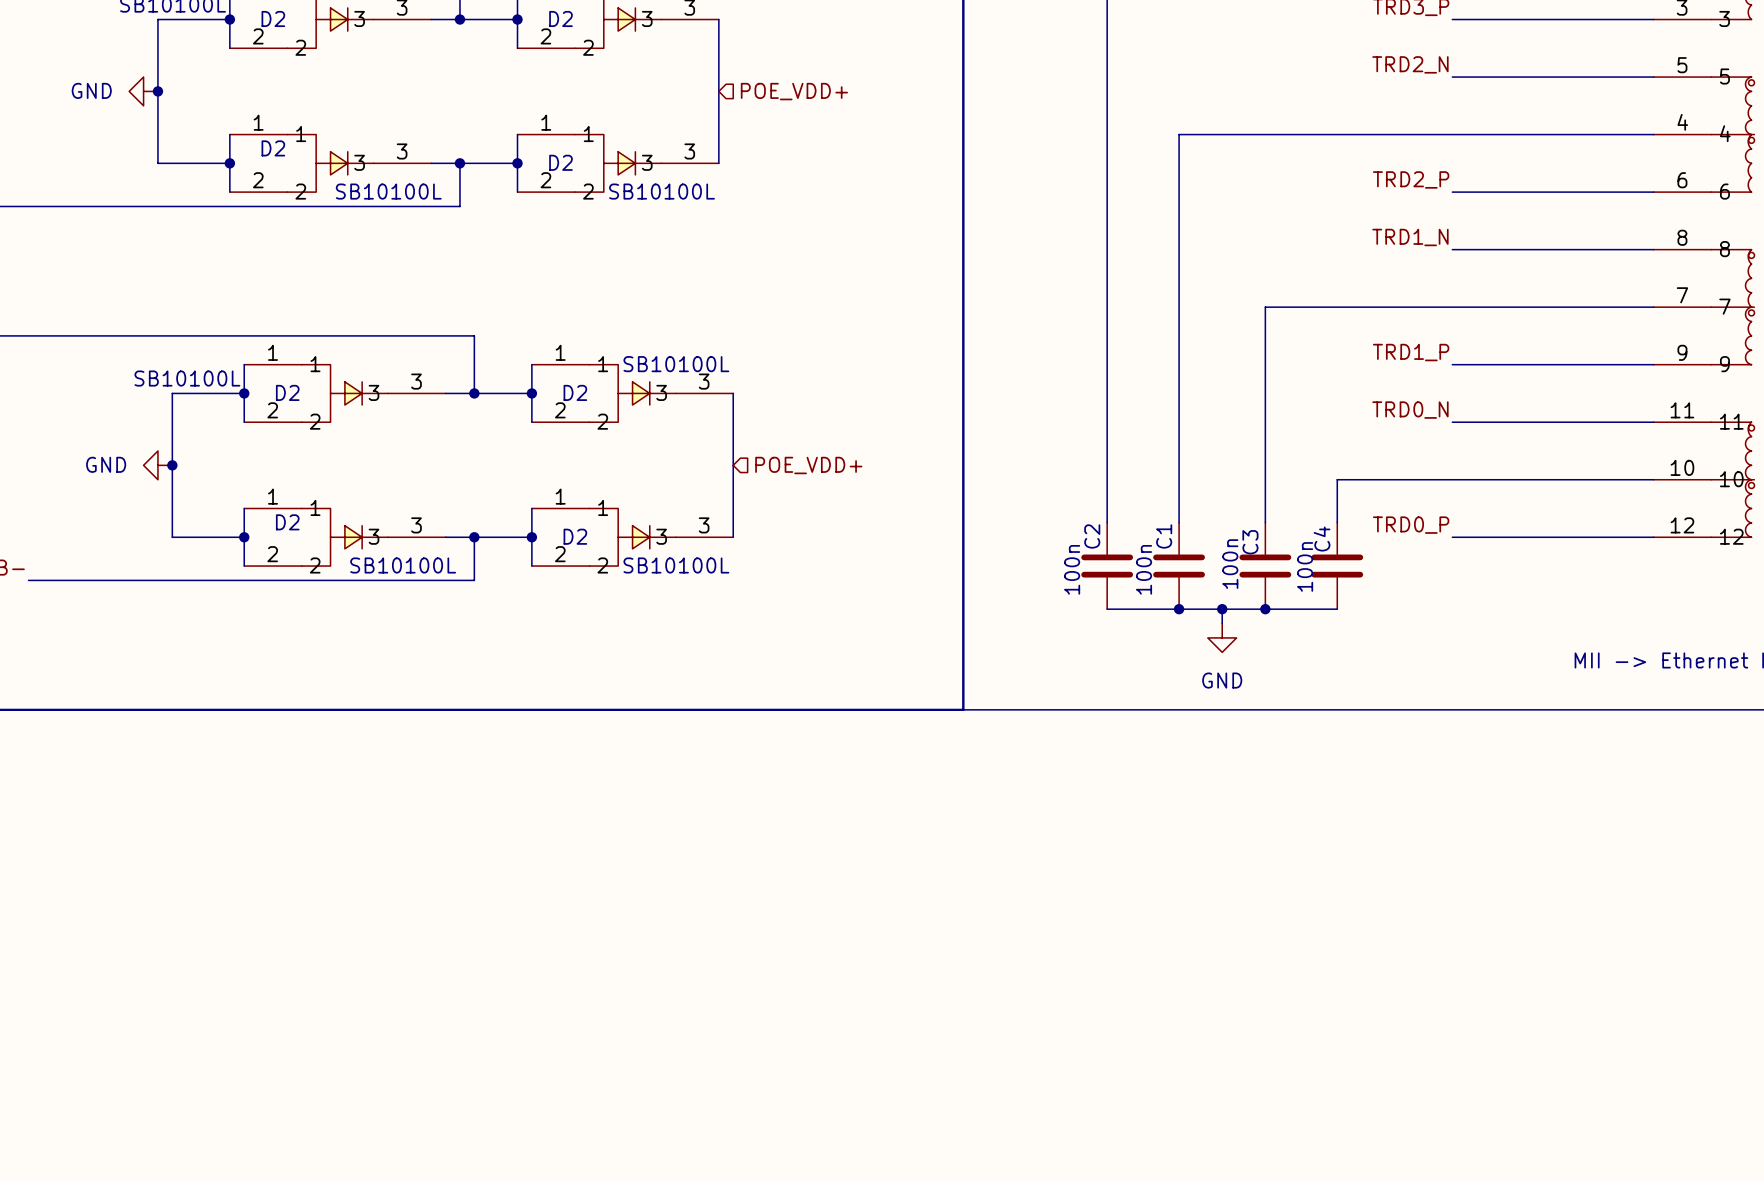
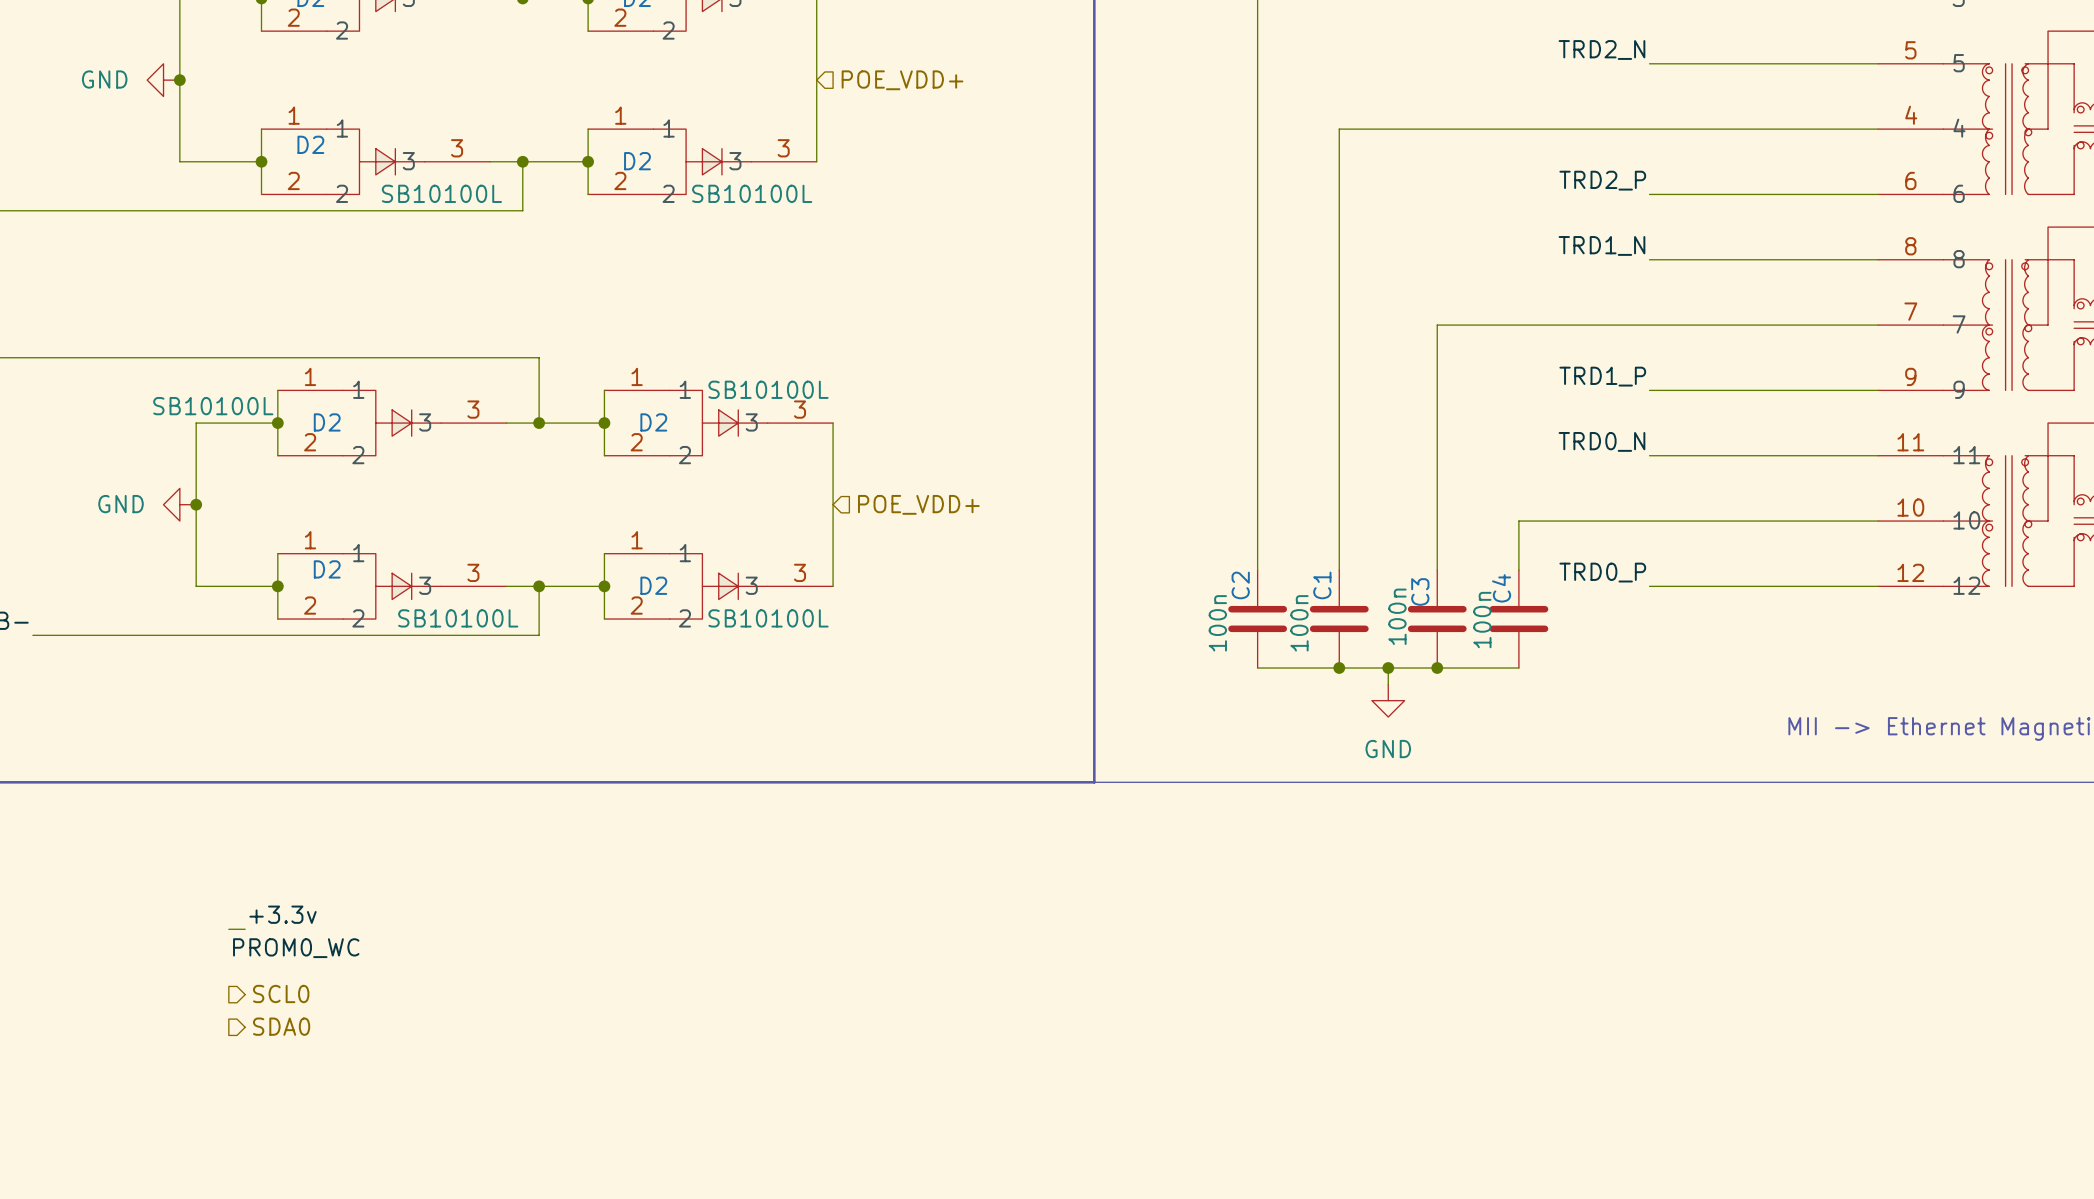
label: none -> +3.3v (283, 914)
wire: none -> (228, 929) (245, 929)
label: none -> PROM0_WC (296, 948)
hierarchical label: none -> SCL0 (281, 993)
hierarchical label: none -> SDA0 (281, 1026)

